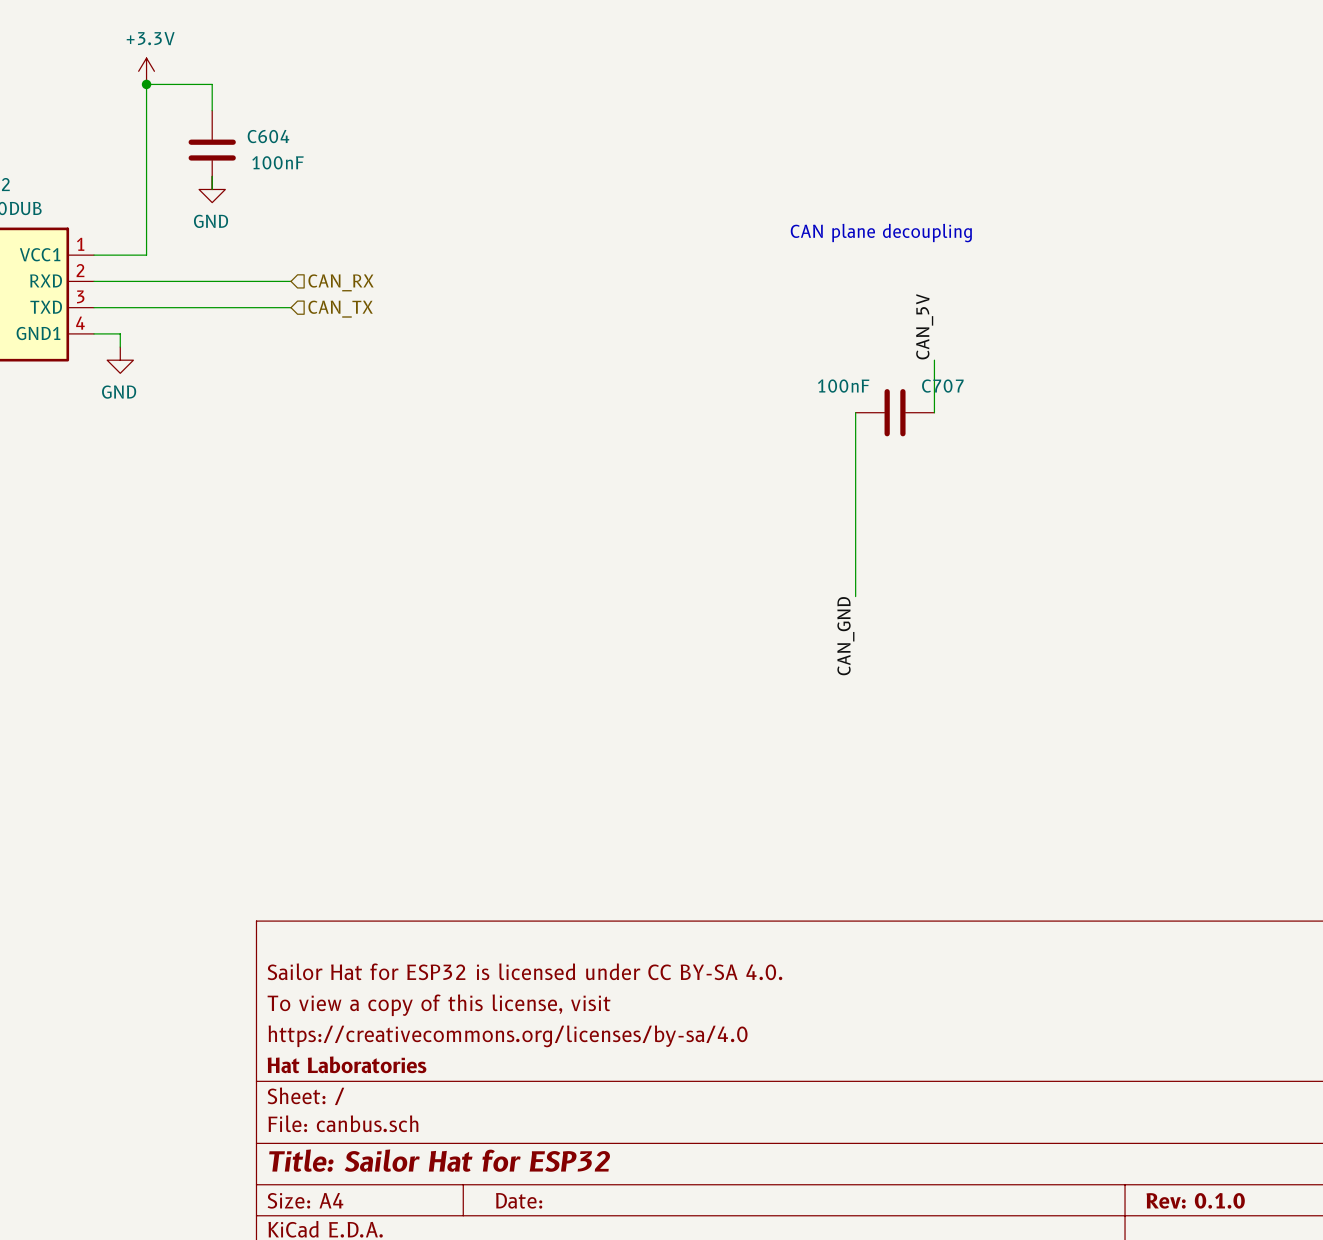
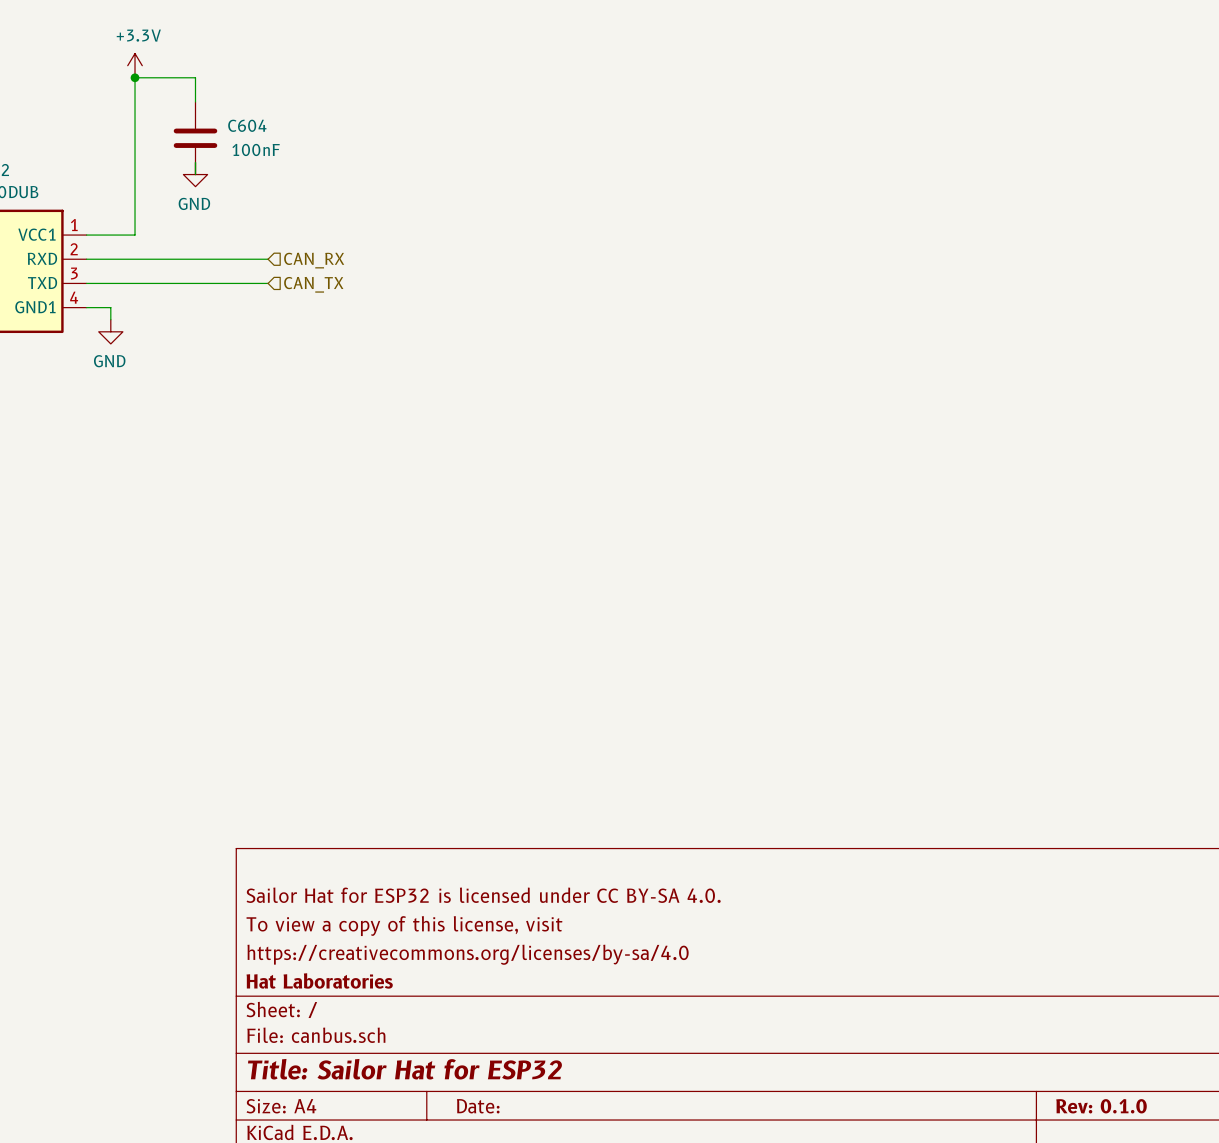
text: CAN plane decoupling (881, 233) -> none
label: CAN_5V (924, 326) -> none
wire: (934, 360) (934, 412) -> none
wire: (855, 412) (855, 596) -> none
C707: 100nF (895, 412) -> none
label: CAN_GND (845, 636) -> none

